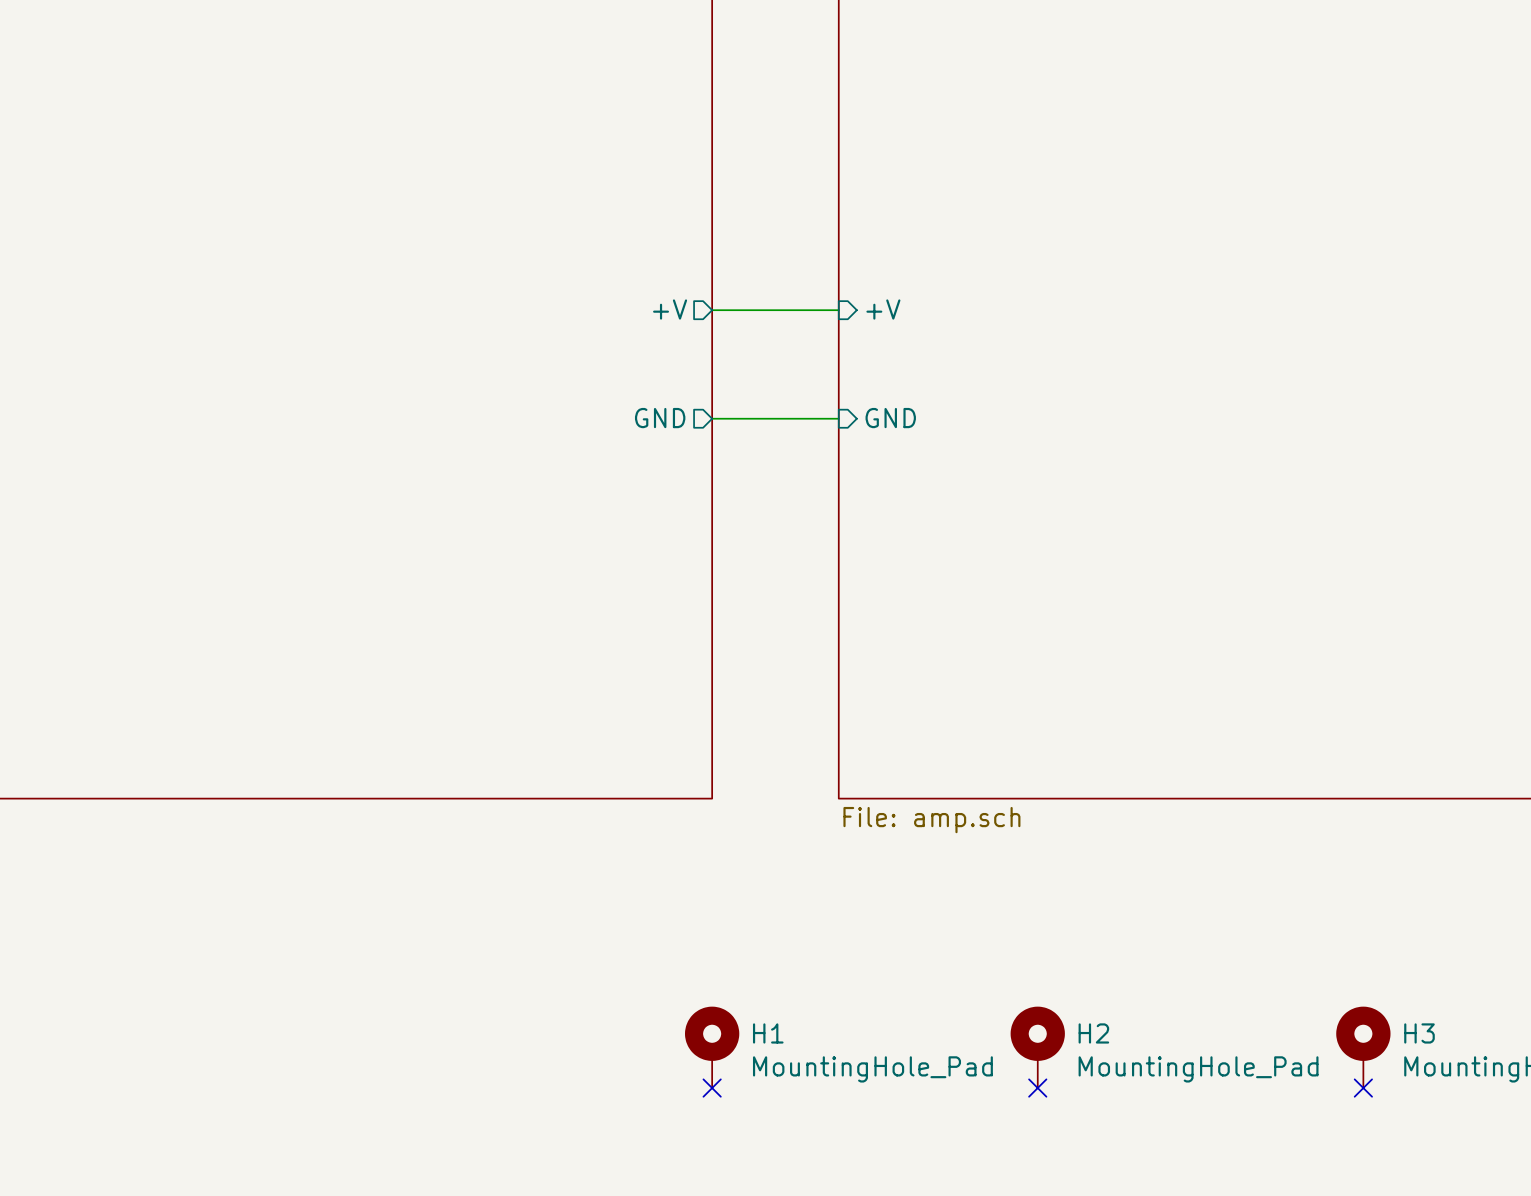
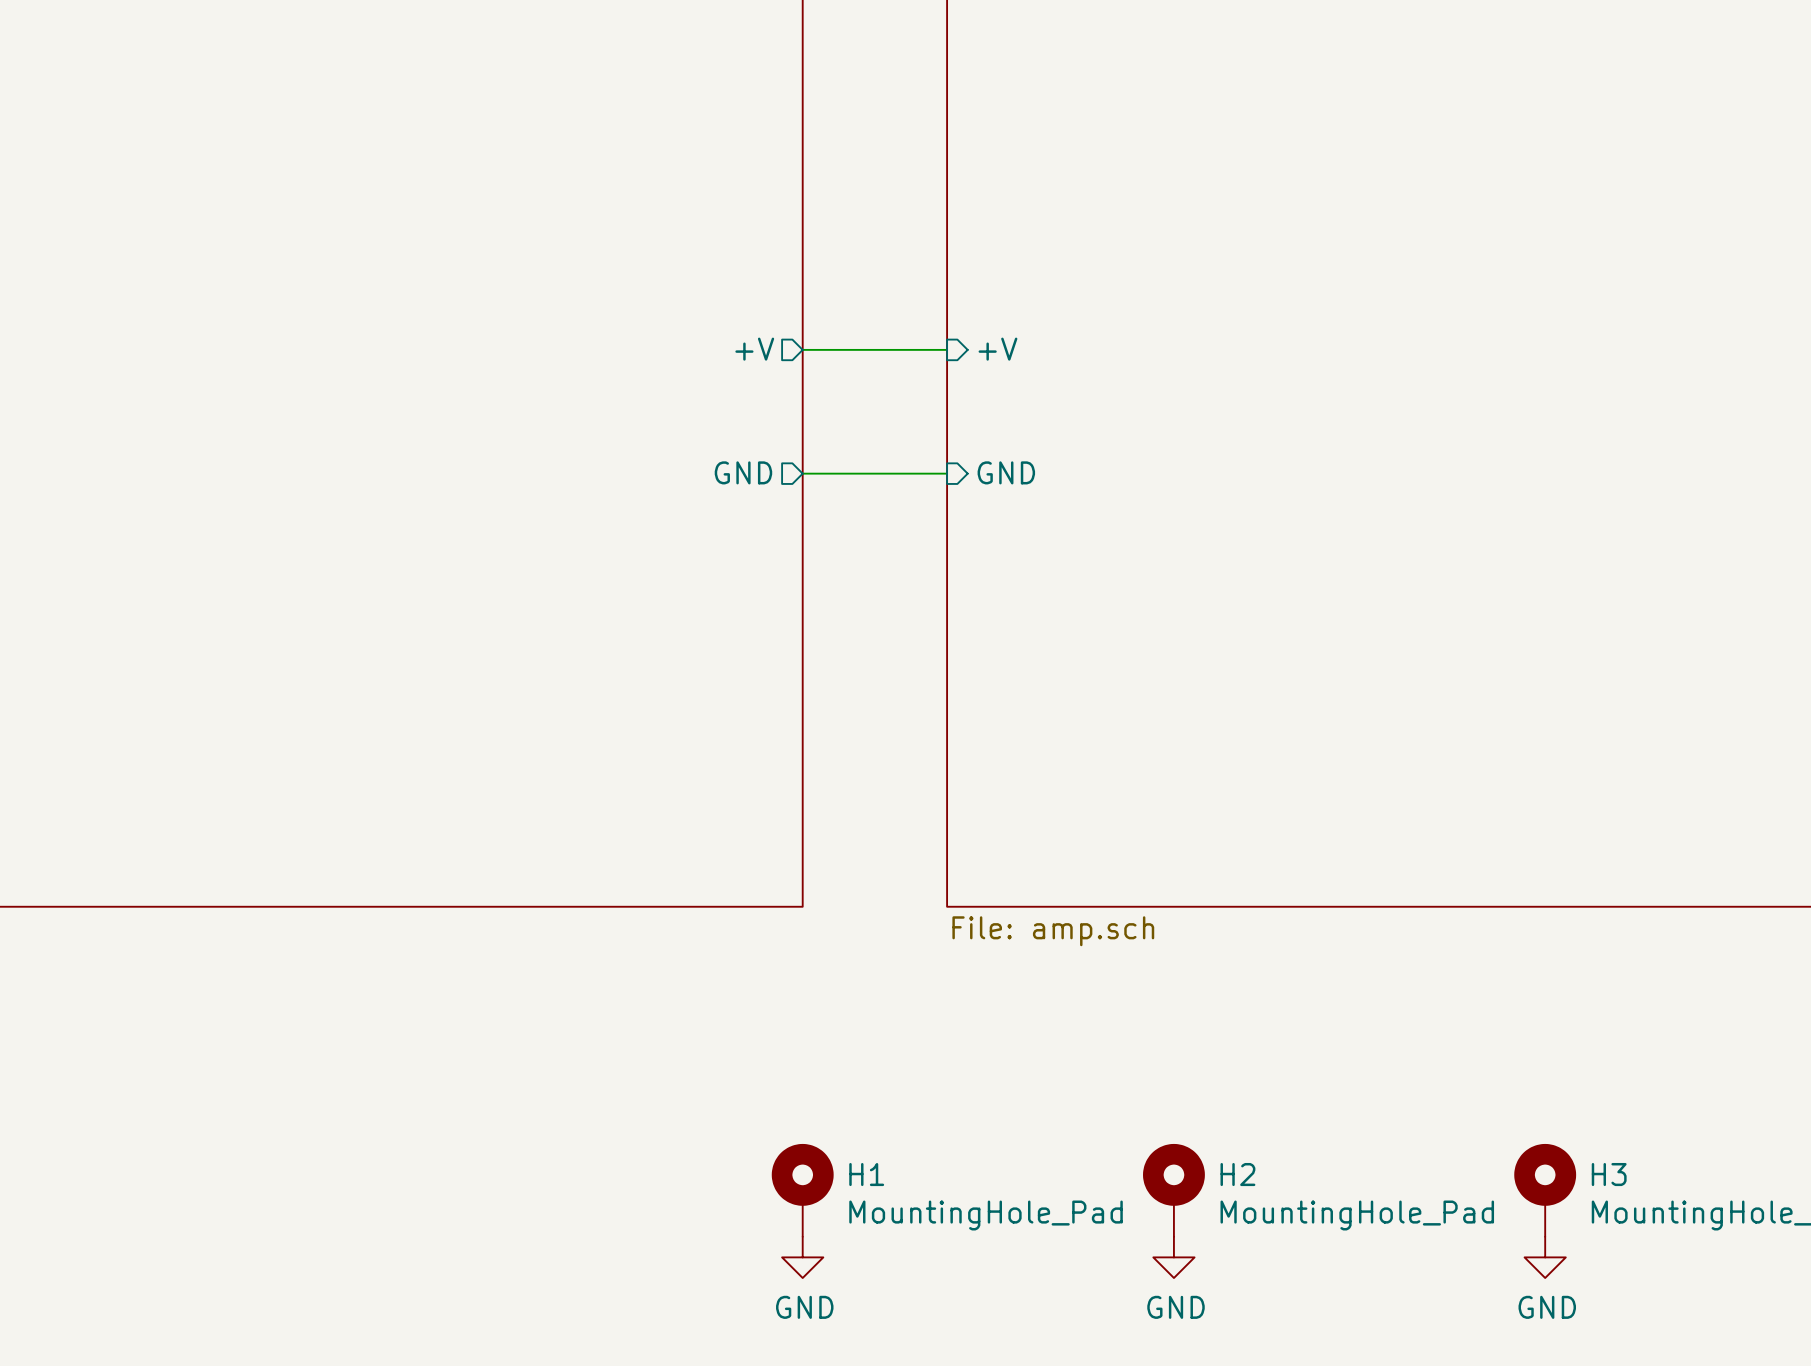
no-connect mark: (712, 1088) -> none
no-connect mark: (1037, 1088) -> none
no-connect mark: (1363, 1088) -> none
power symbol: none -> GND (802, 1257)
power symbol: none -> GND (1173, 1257)
power symbol: none -> GND (1545, 1257)

